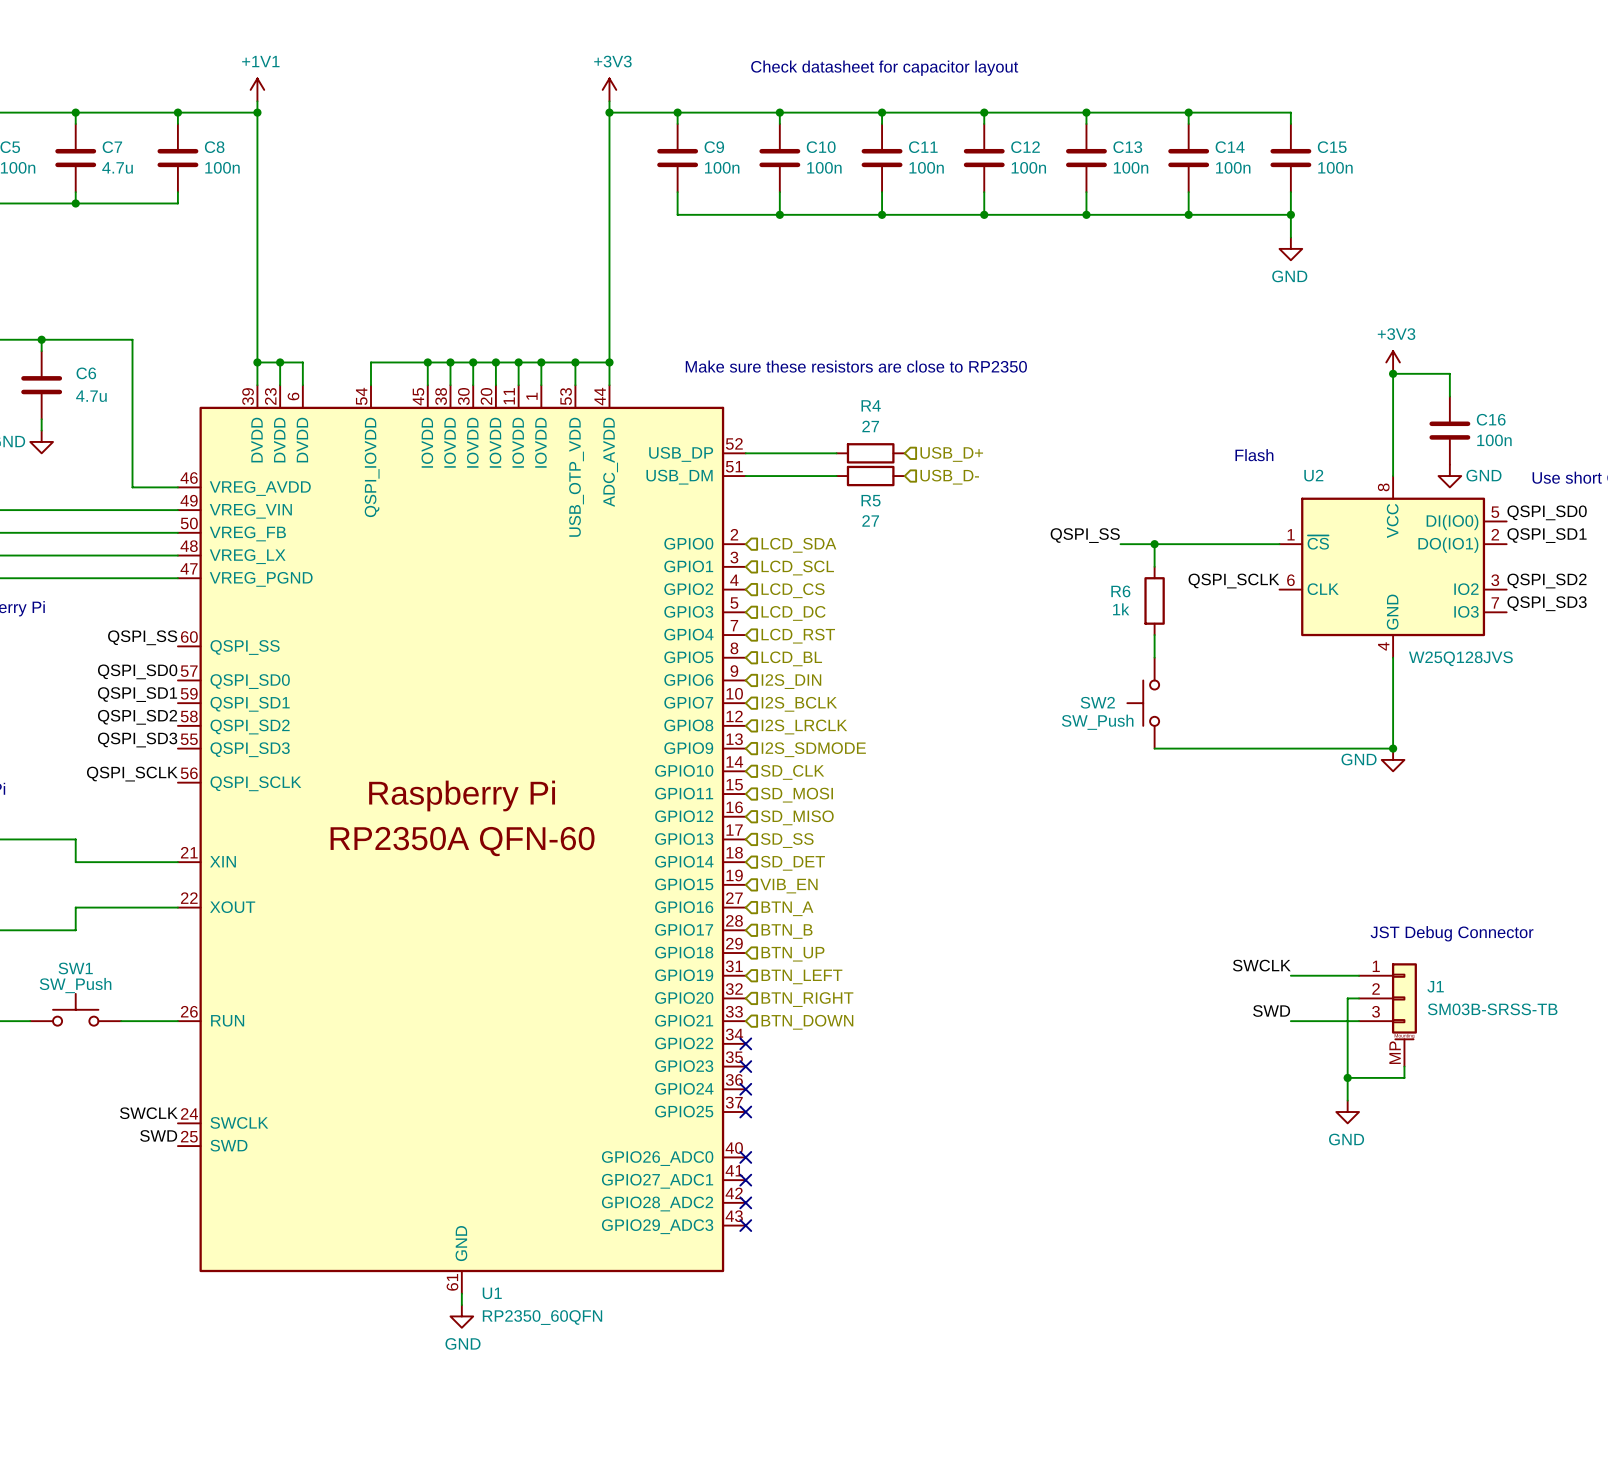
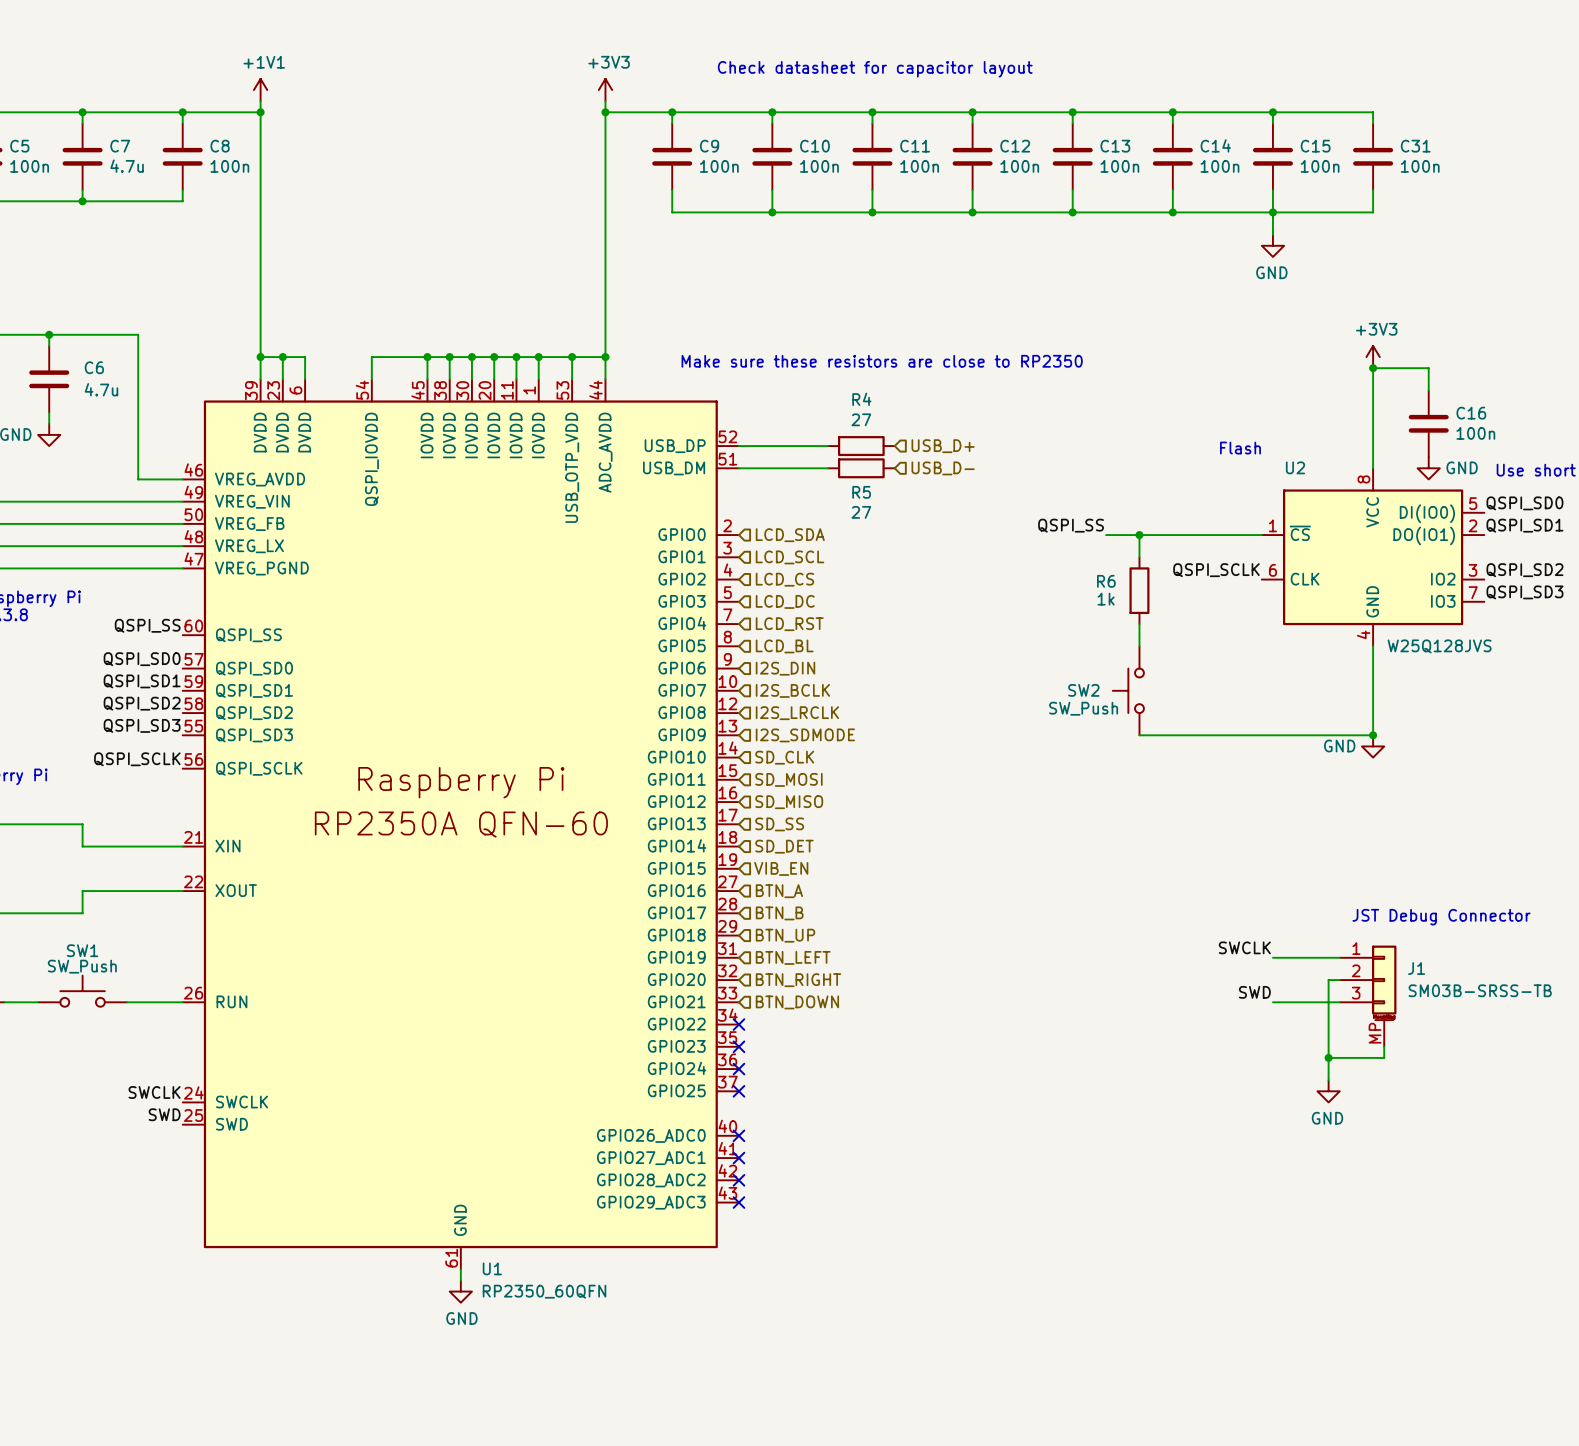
wire: none -> (1272, 112) (1373, 112) (1373, 123)
junction: none -> (1272, 112)
C31: none -> 100n (1373, 156)
wire: none -> (1373, 190) (1373, 212) (1272, 212)

